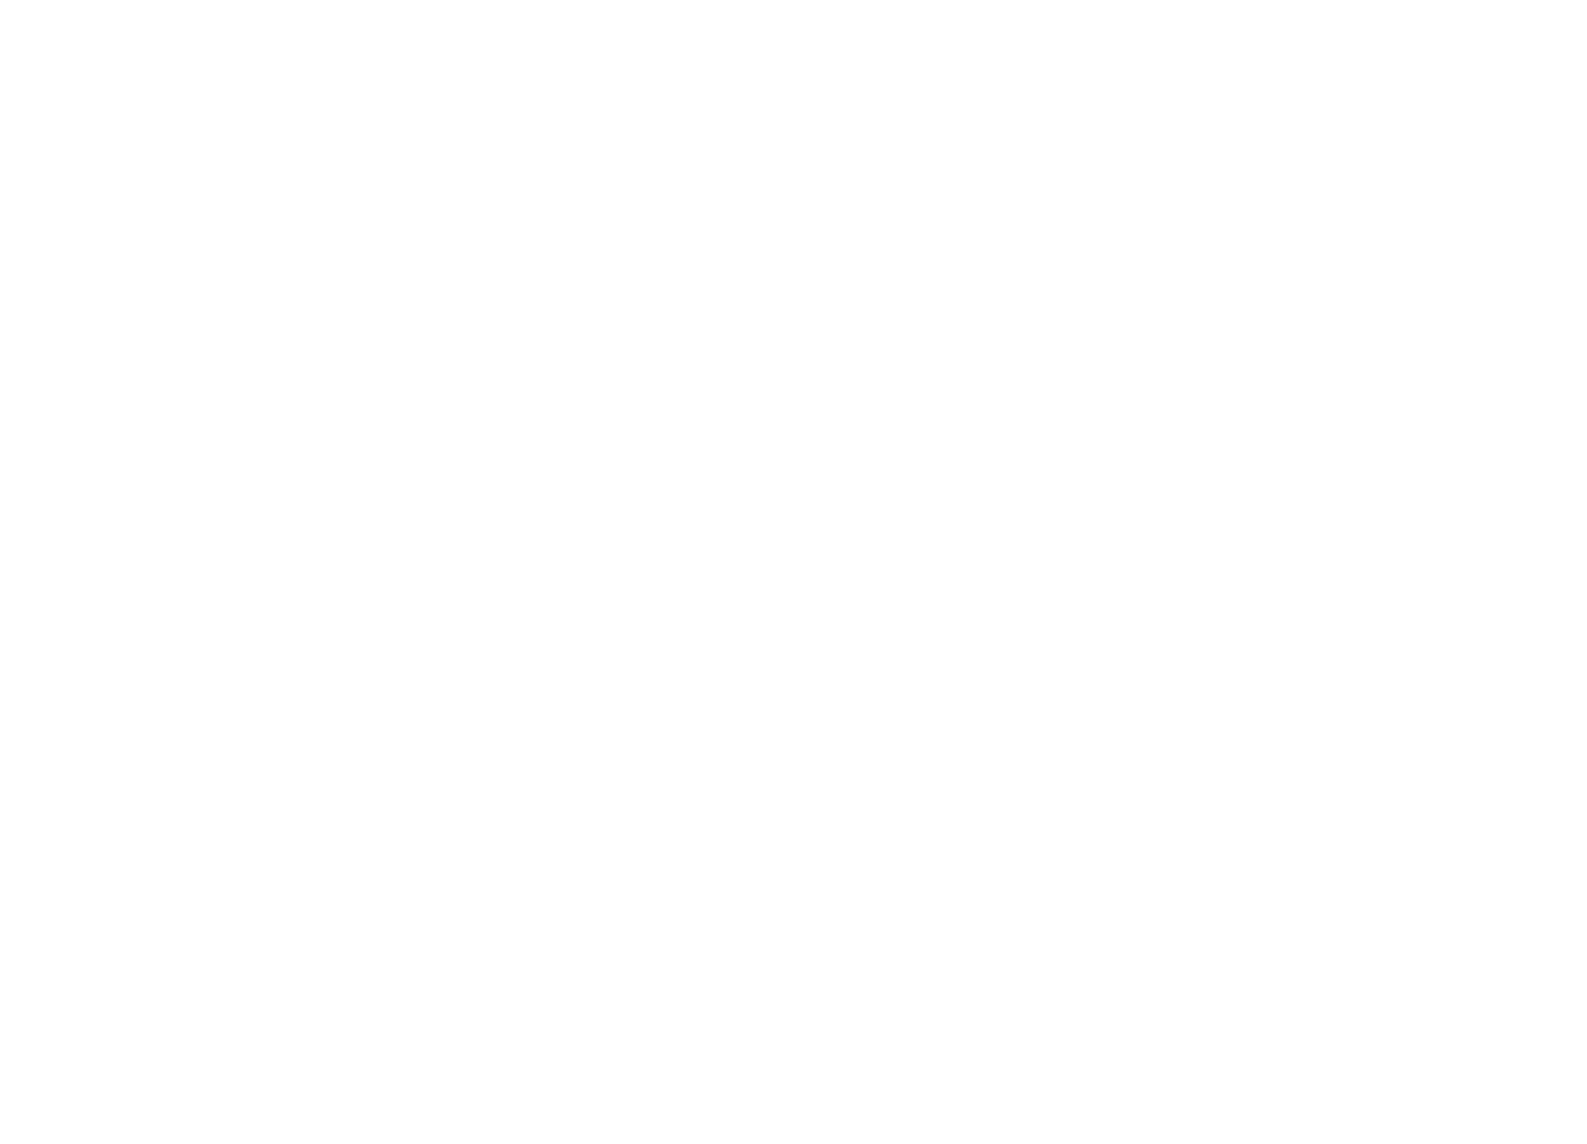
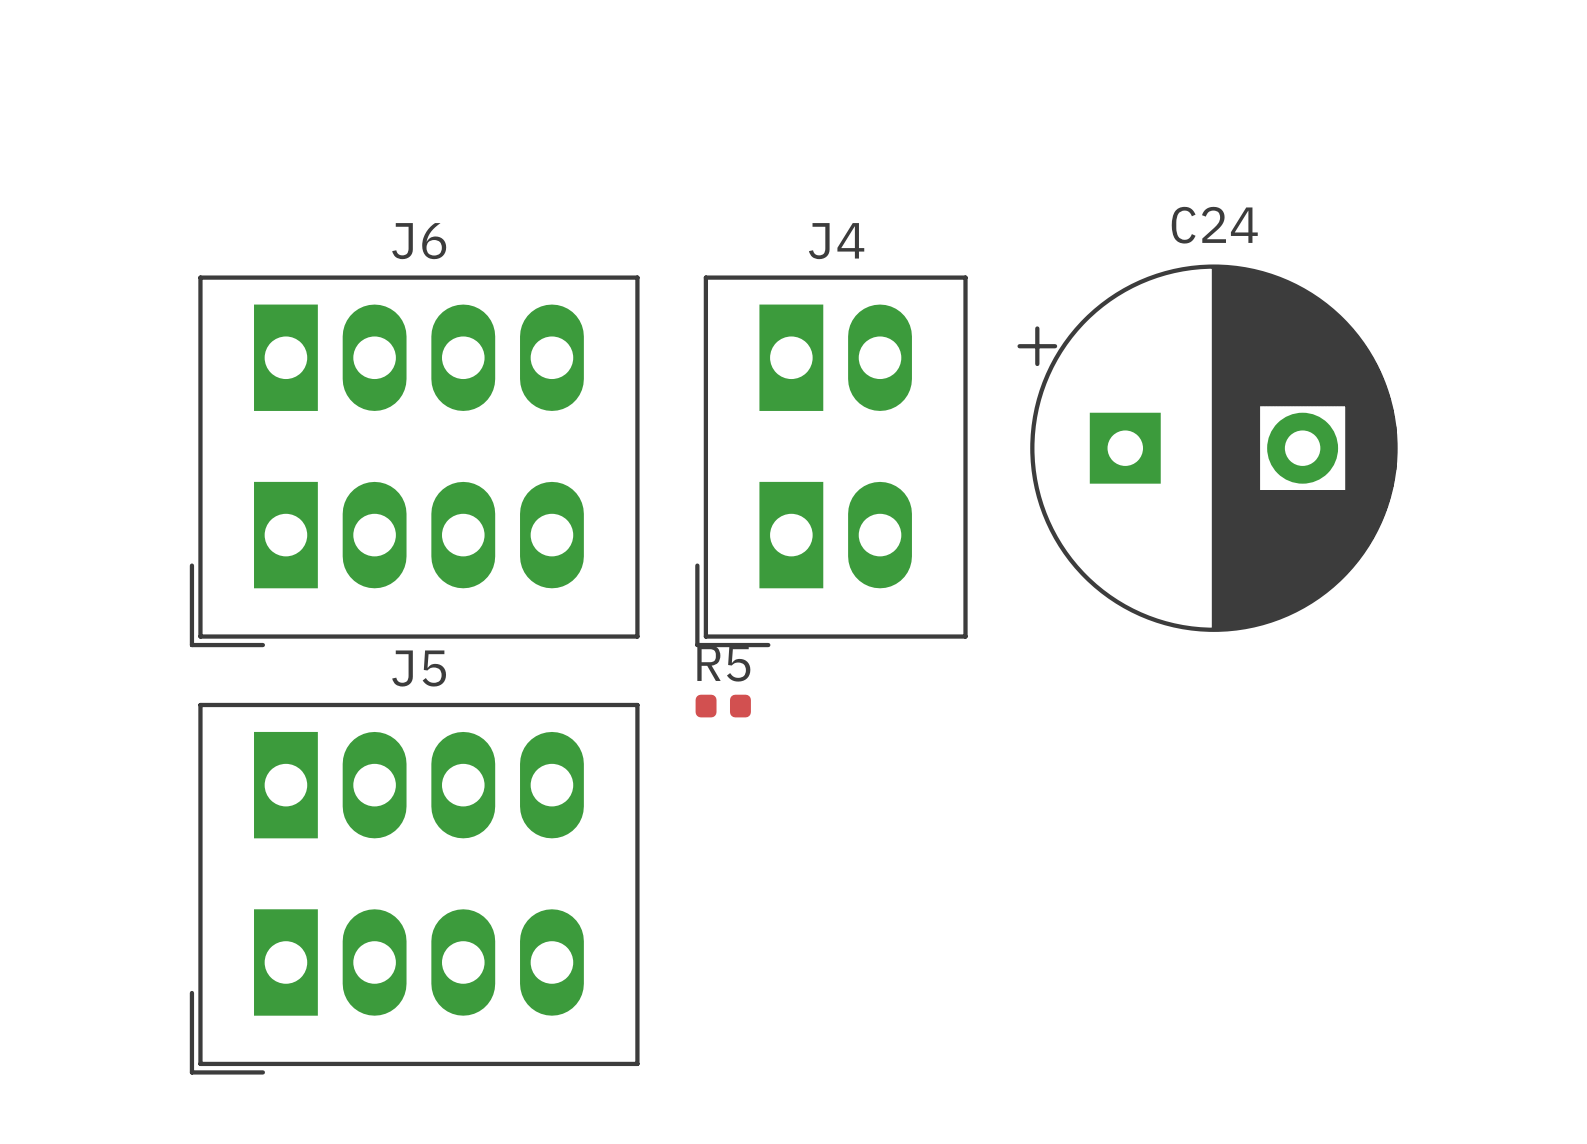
C24: none -> (1207, 448)
J6: none -> (414, 461)
J4: none -> (831, 461)
R5: none -> (723, 706)
J5: none -> (414, 888)

